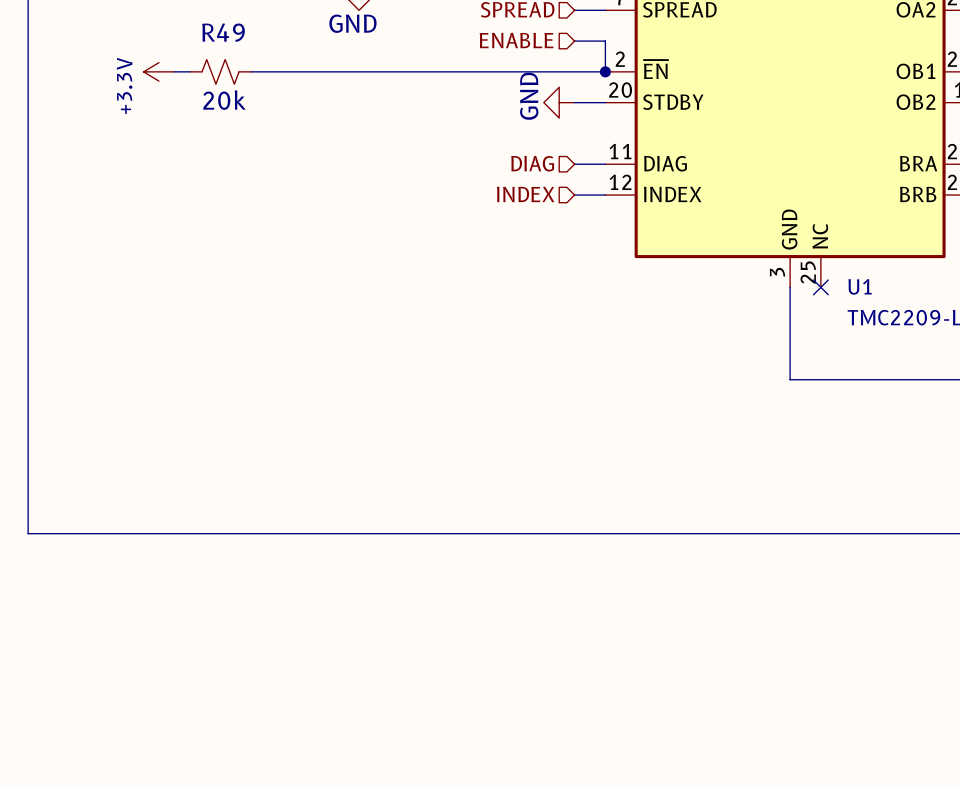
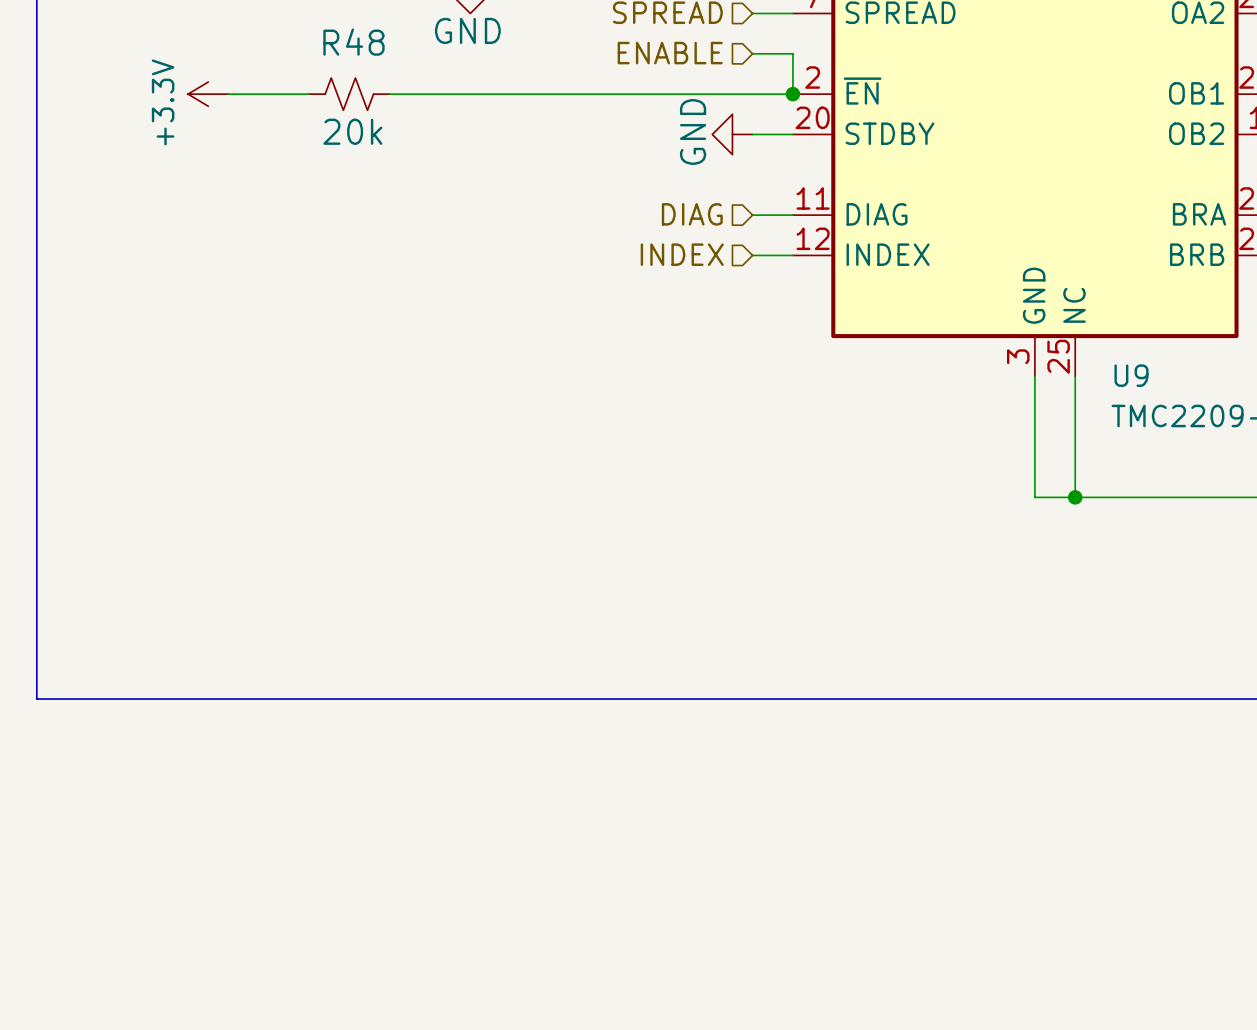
R49: 20k (220, 71) -> none
wire: (251, 71) (297, 71) -> (248, 94) (309, 94)
R48: none -> 20k (349, 94)
U1 name: U1 (860, 286) -> U9 (1131, 375)
wire: none -> (1075, 376) (1075, 497)
no-connect mark: (820, 287) -> none
junction: none -> (1075, 497)

